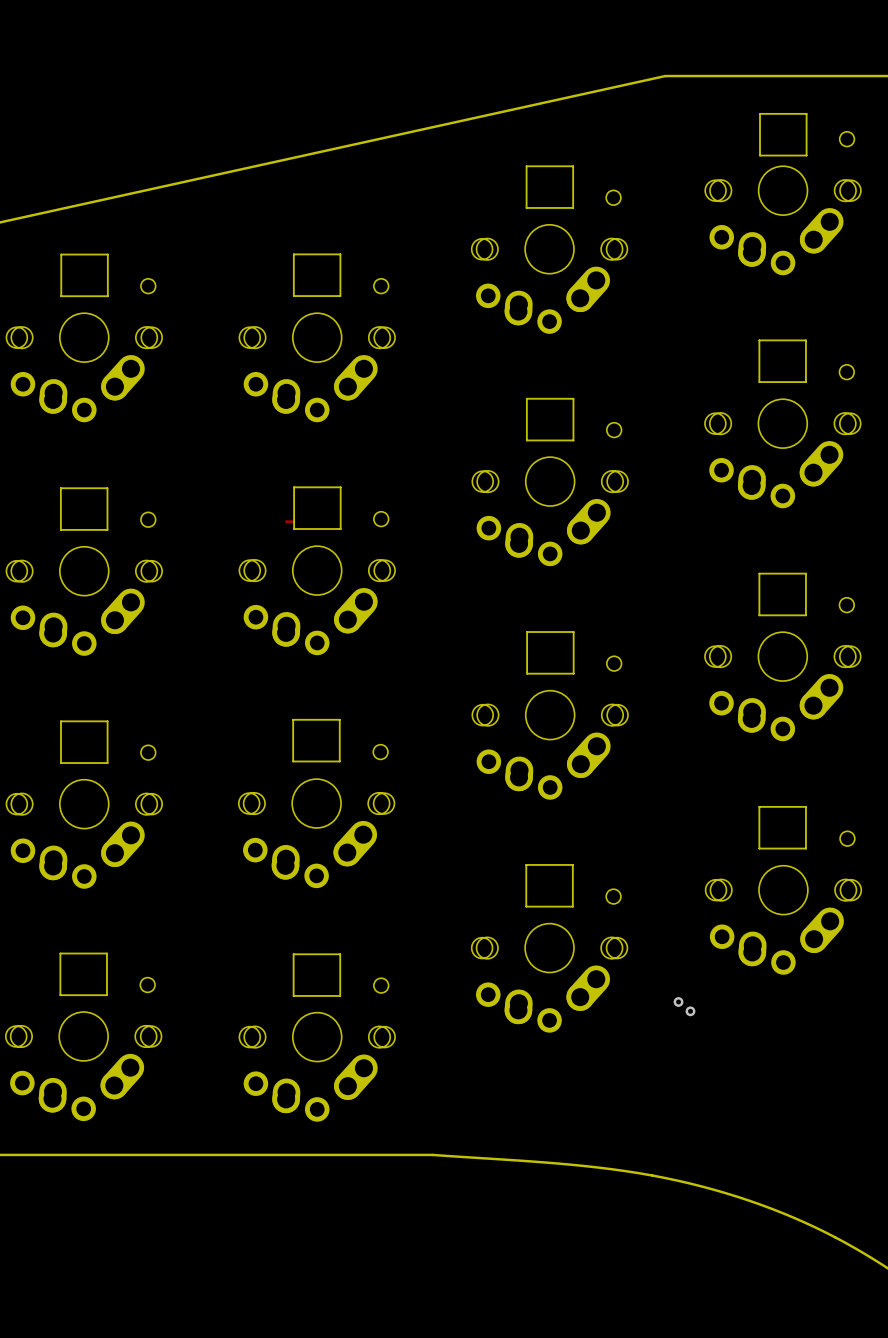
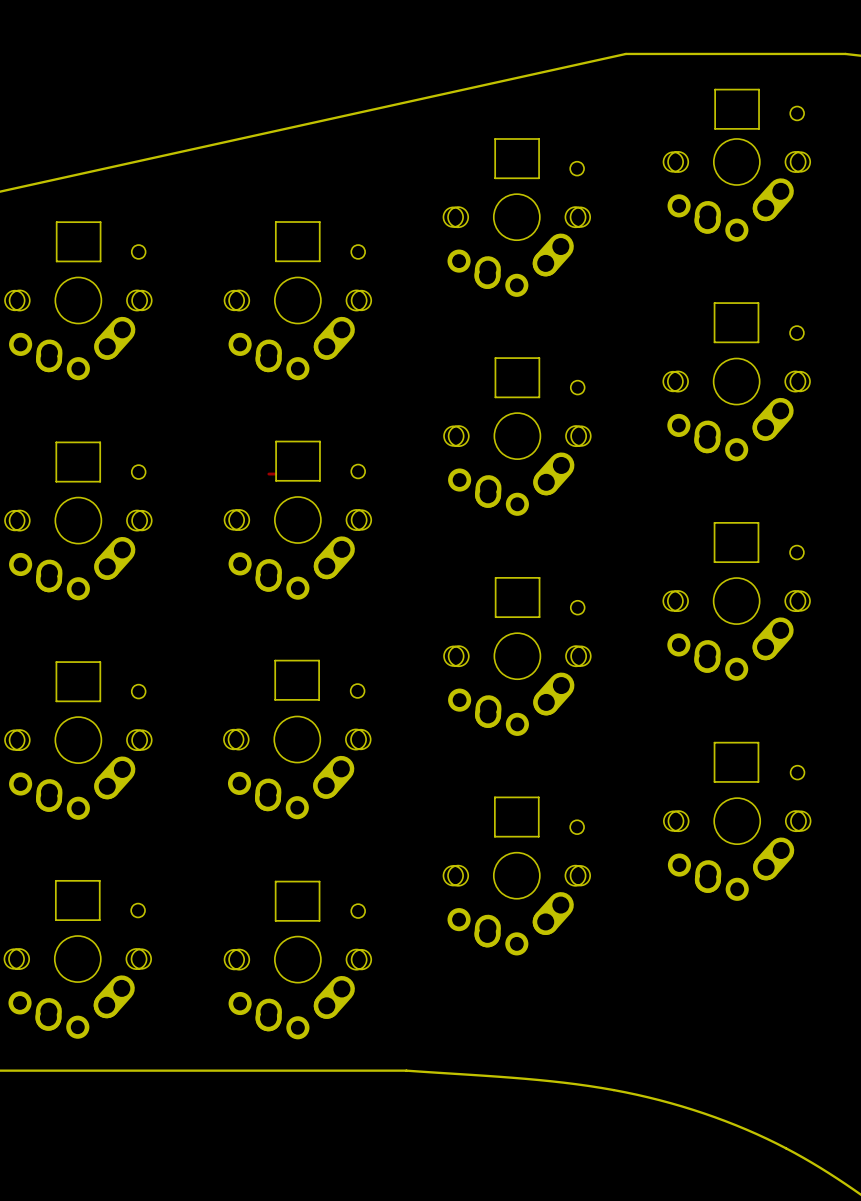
via: (678, 1001) -> none
via: (690, 1011) -> none

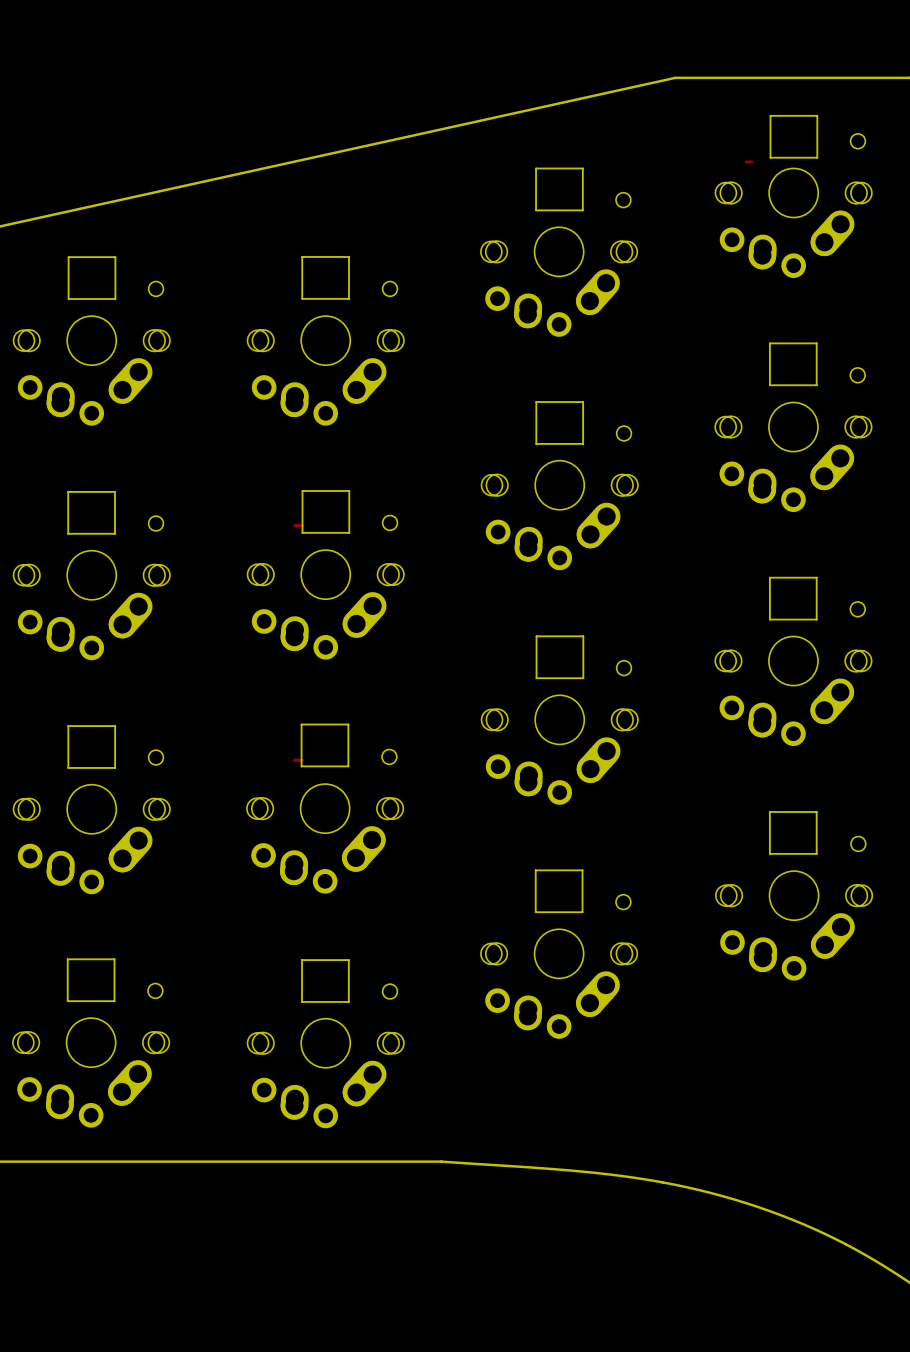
track: none -> (746, 161) (751, 161)
track: none -> (294, 760) (302, 760)

